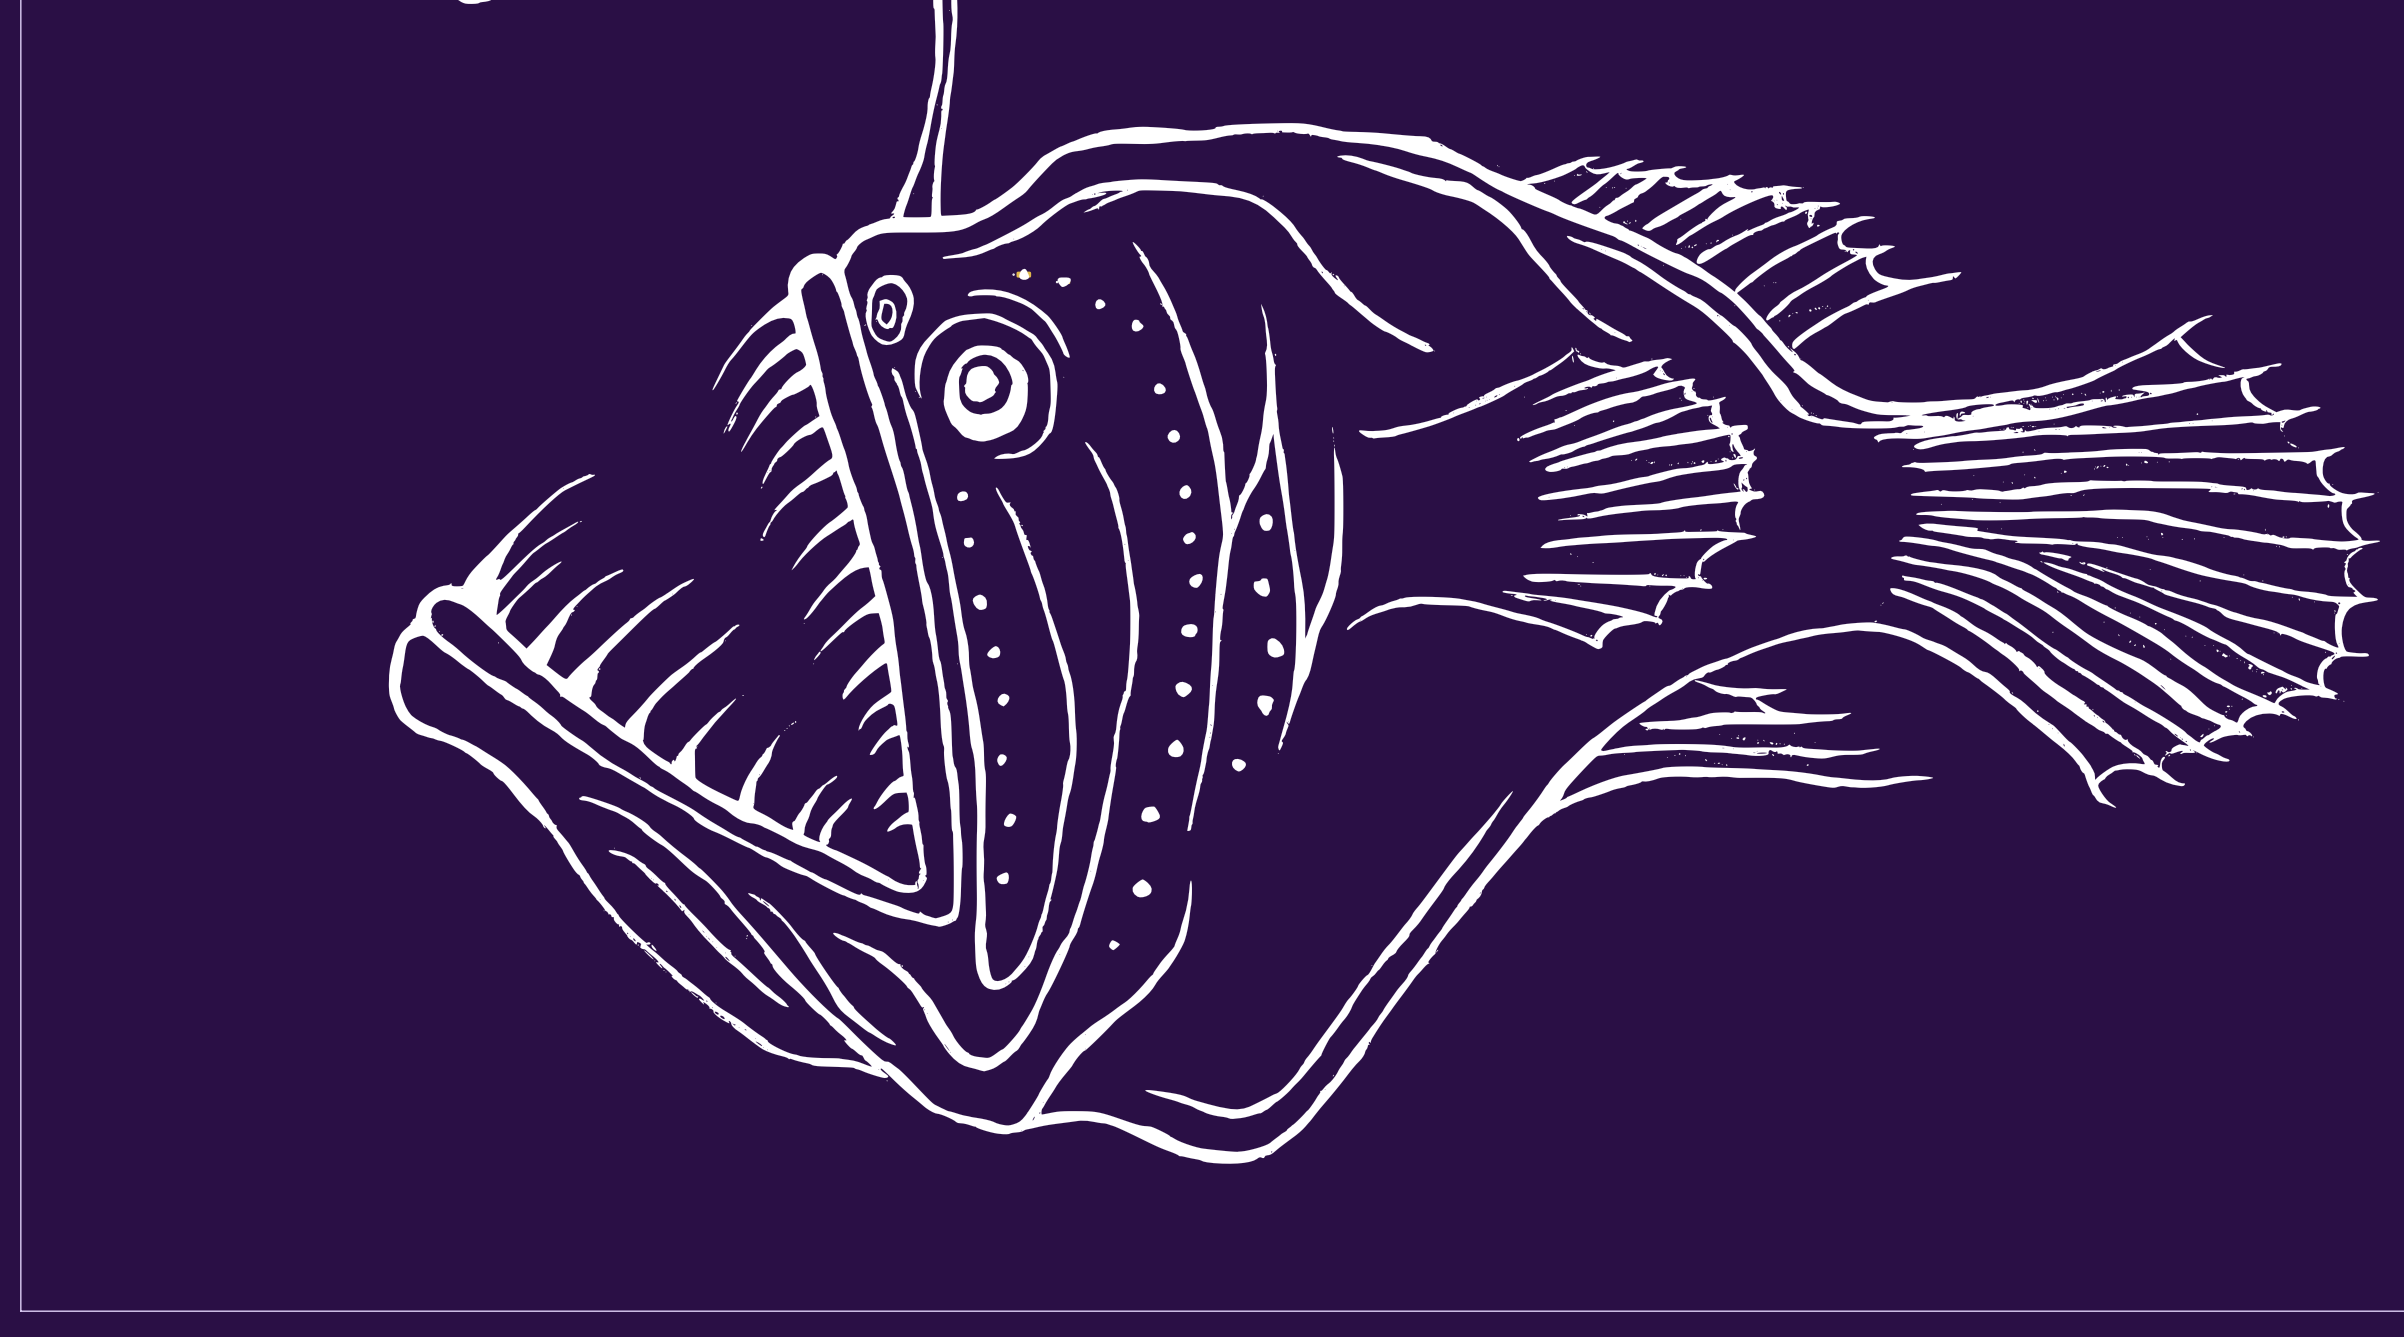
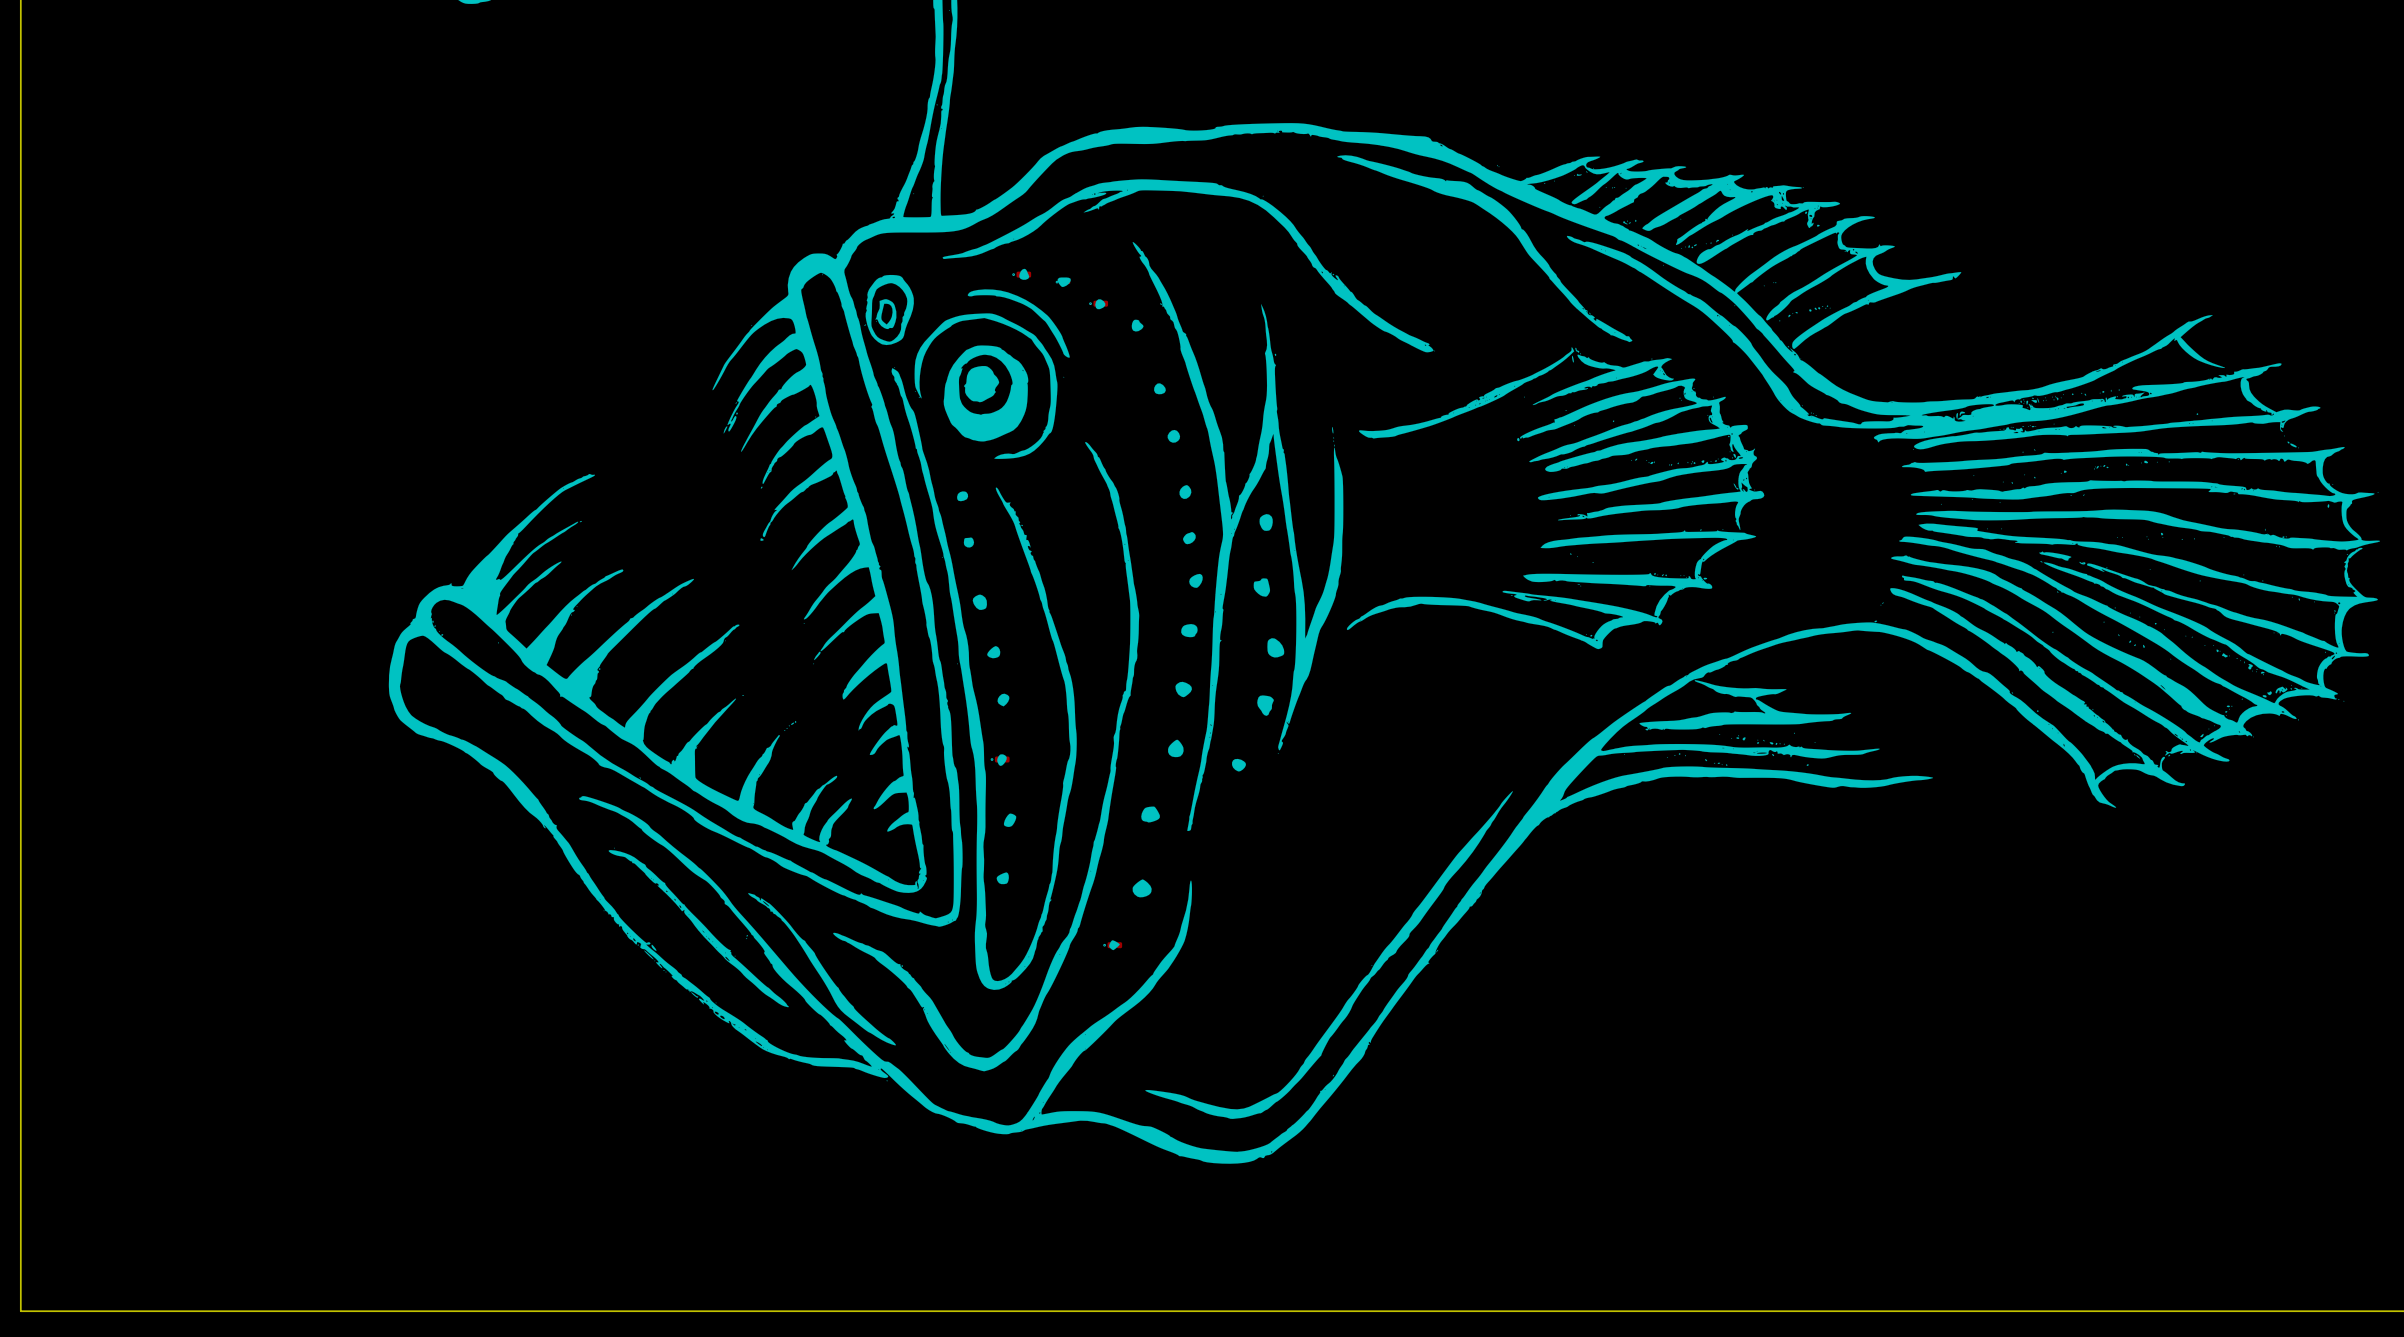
part: none -> (1098, 303)
part: none -> (1000, 759)
part: none -> (1112, 945)

